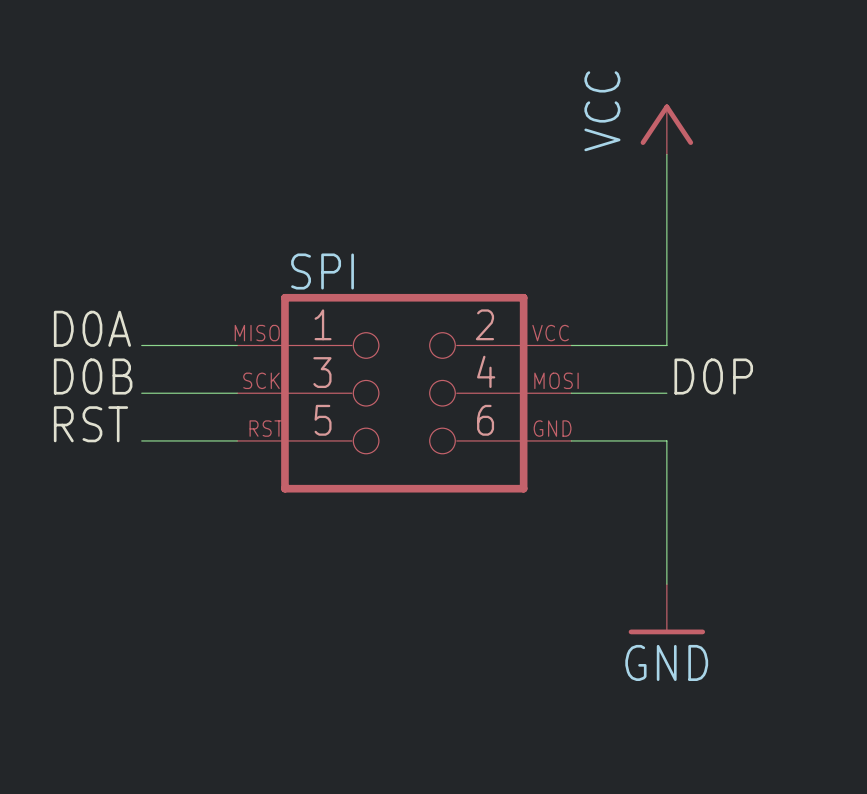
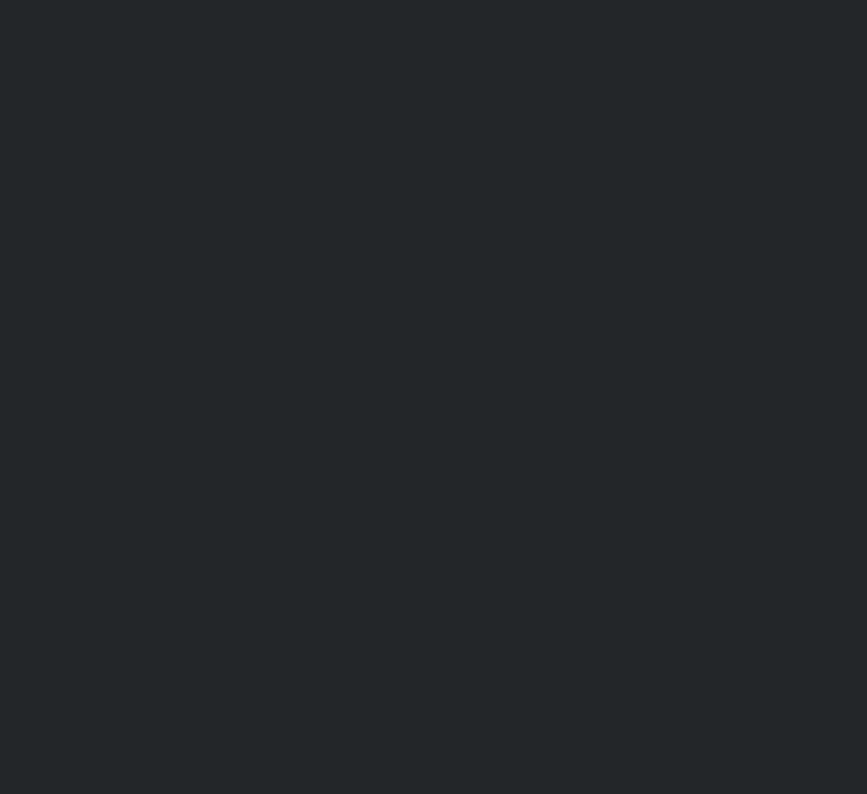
power symbol: VCC (666, 129) -> none
wire: (666, 154) (666, 345) (571, 345) -> none
label: D0A (92, 328) -> none
wire: (141, 345) (237, 345) -> none
label: D0B (93, 376) -> none
label: D0P (713, 376) -> none
wire: (141, 393) (237, 393) -> none
SPI: (404, 393) -> none
wire: (571, 393) (666, 393) -> none
label: RST (91, 424) -> none
wire: (141, 440) (237, 440) -> none
wire: (571, 440) (666, 440) (666, 584) -> none
power symbol: GND (666, 609) -> none

